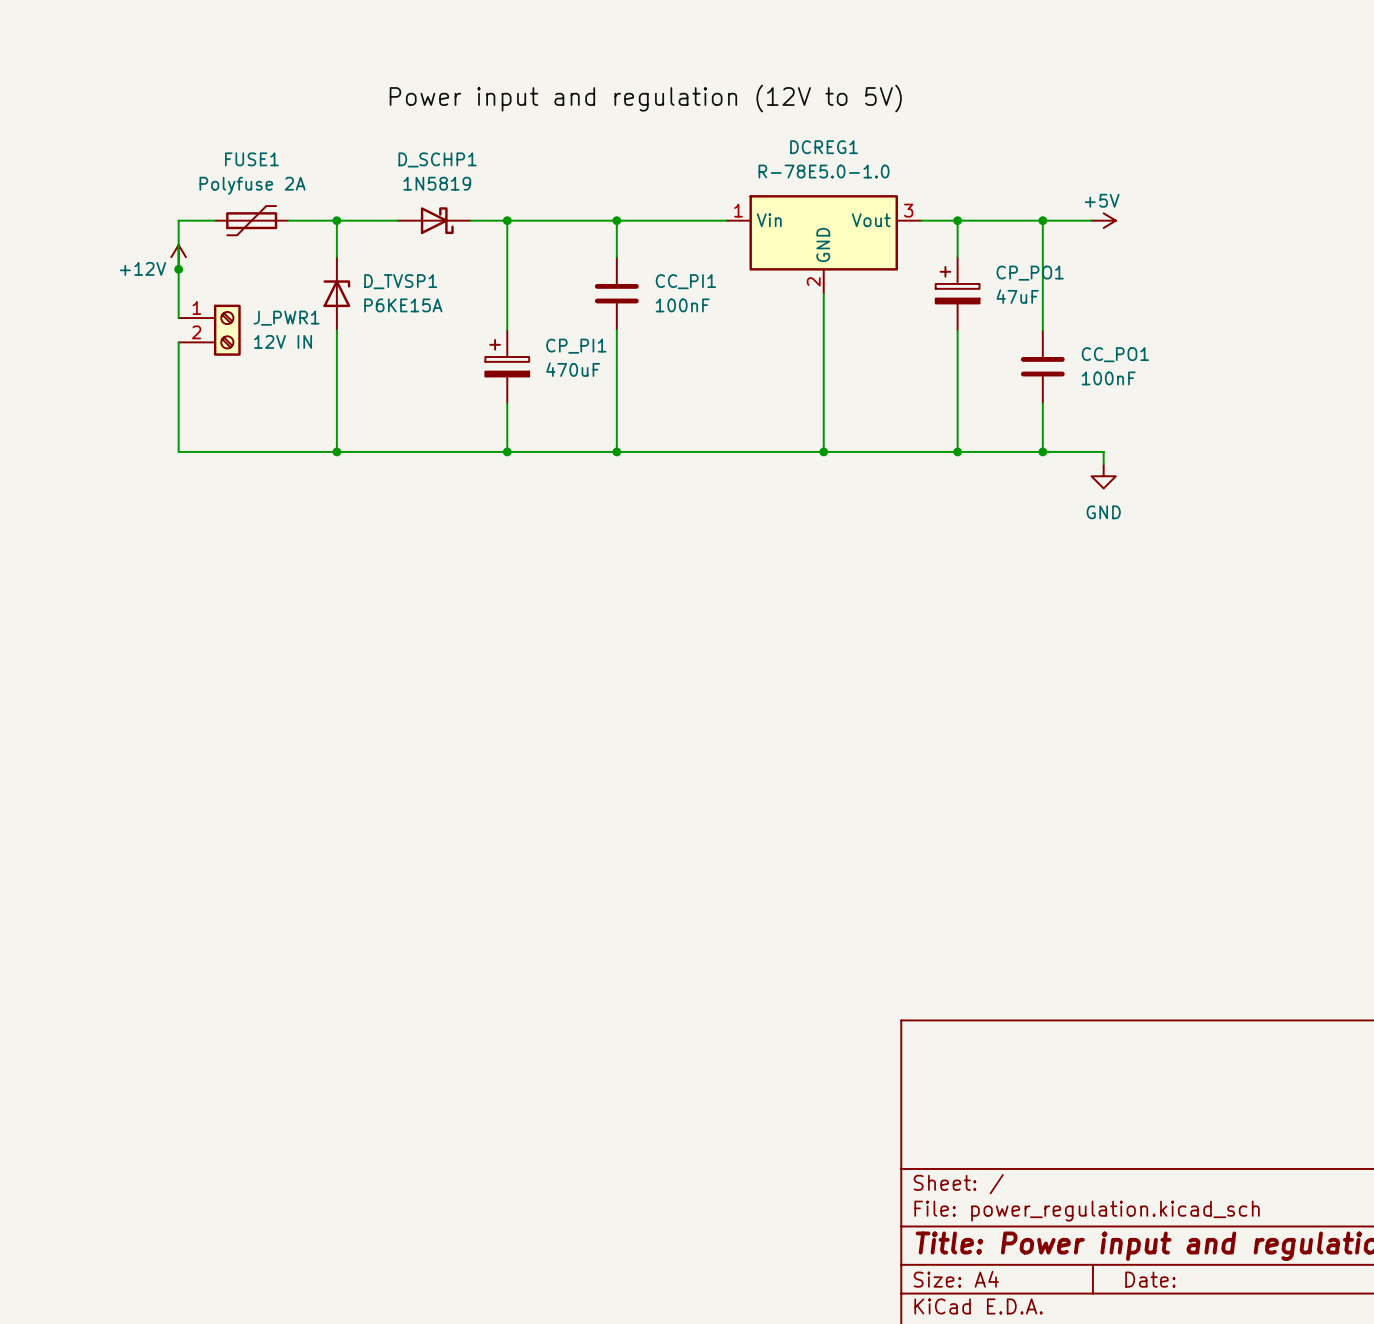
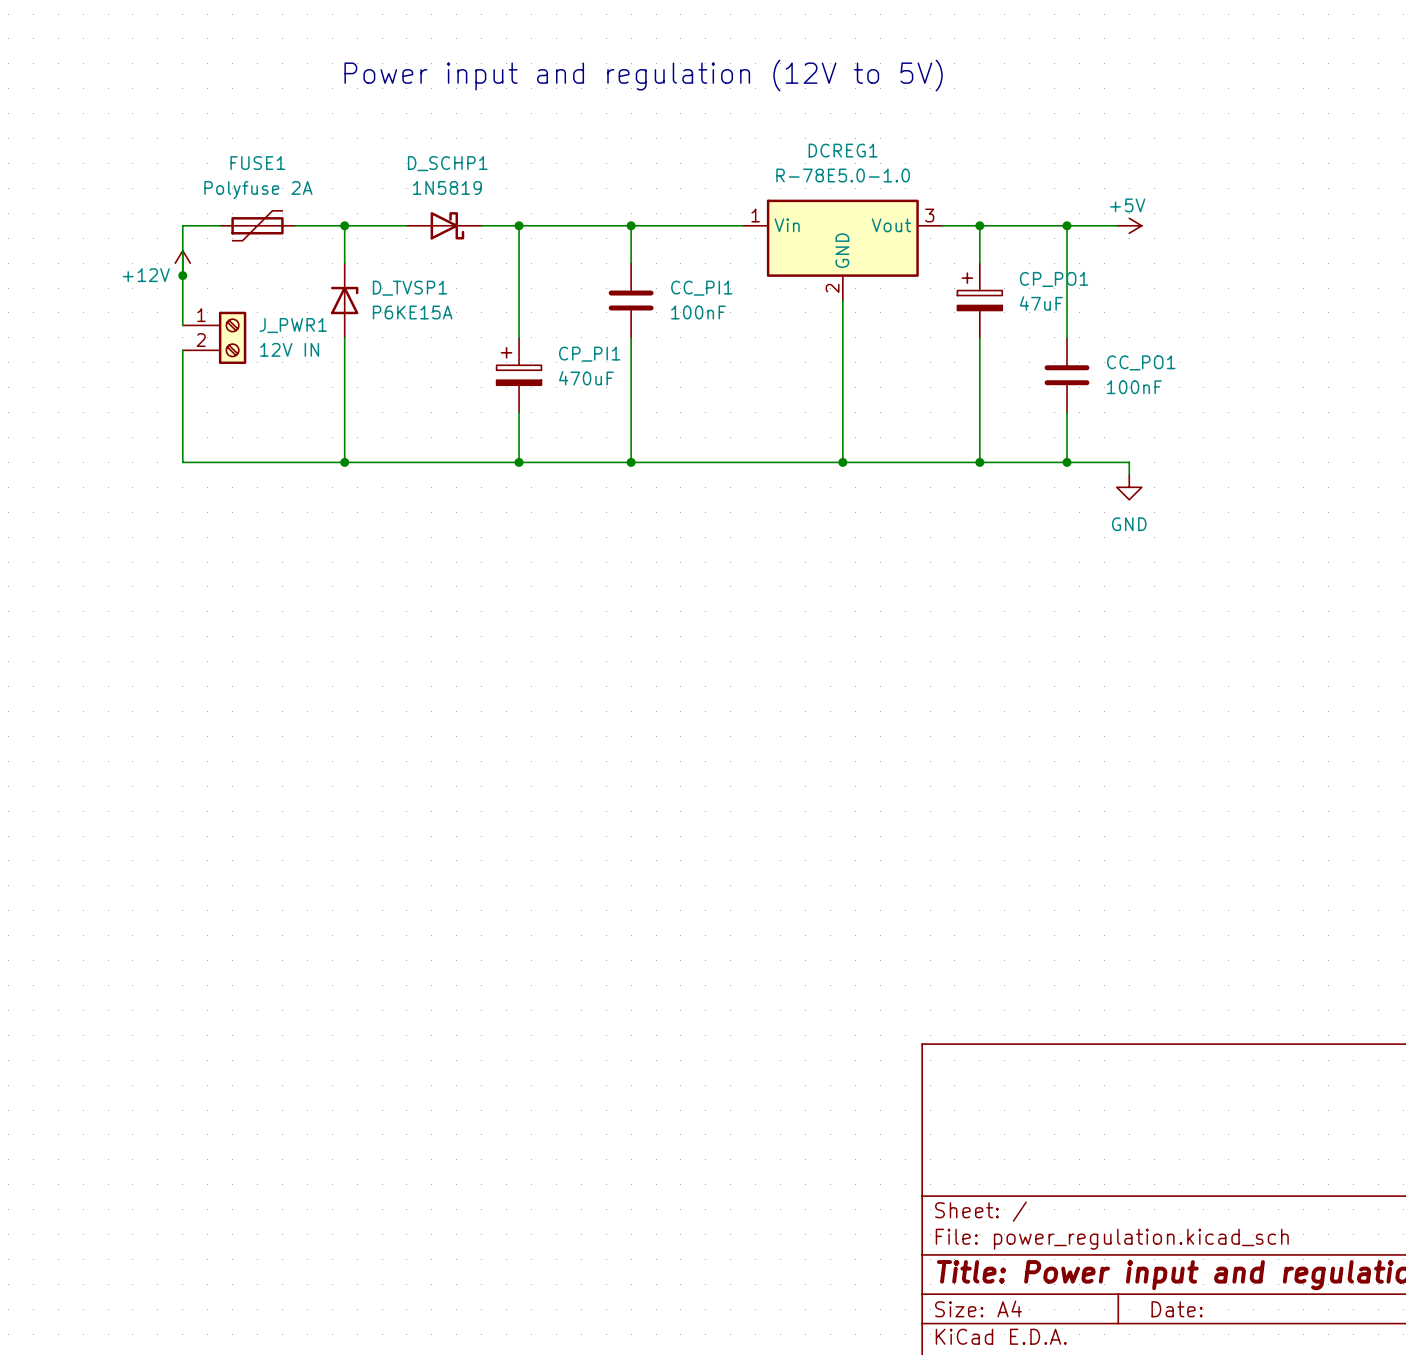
text: none -> Power input and regulation (12V to 5V) (643, 75)
label: Power input and regulation (12V to 5V) (645, 98) -> none

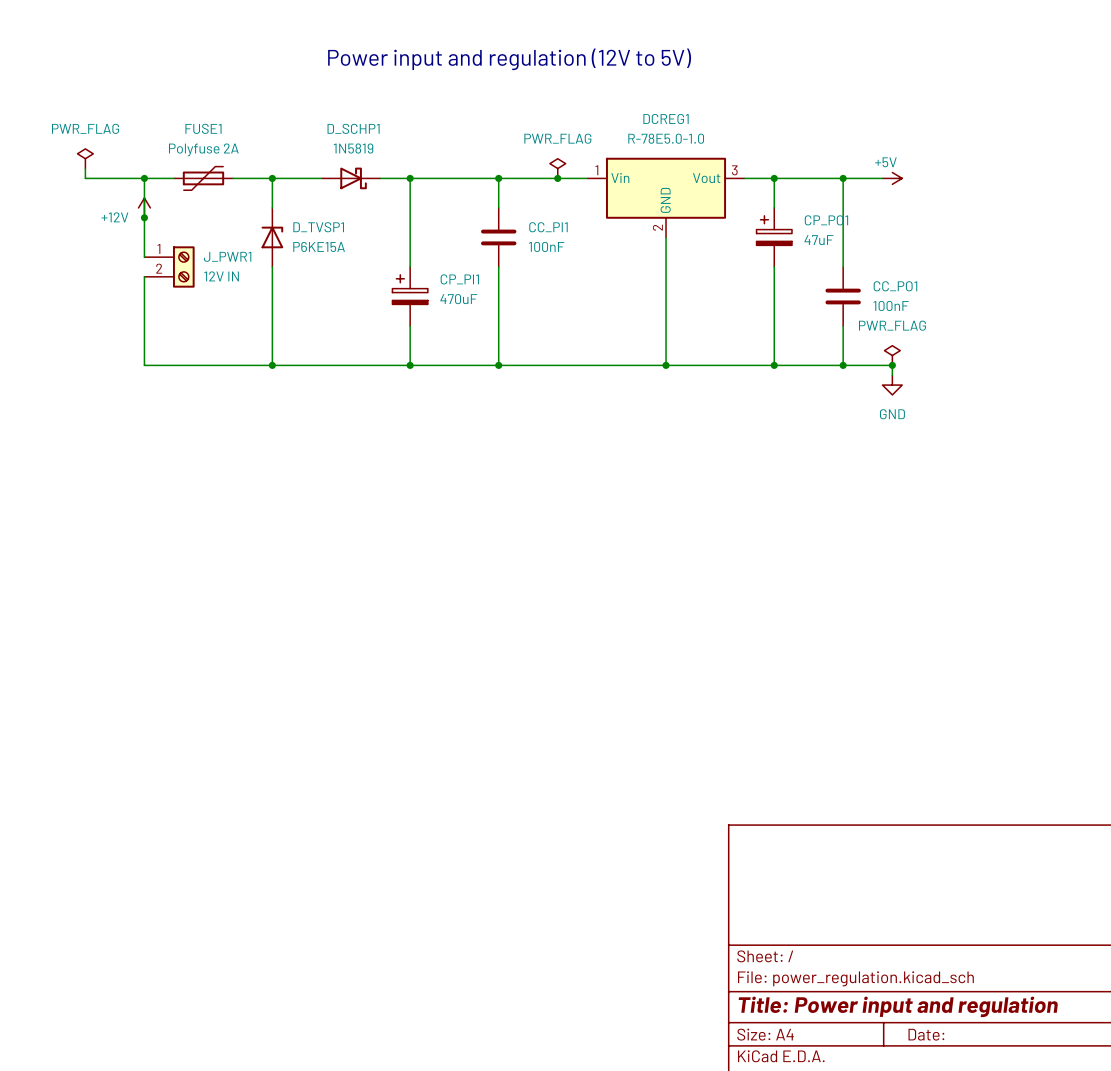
power symbol: none -> PWR_FLAG (85, 158)
wire: none -> (85, 168) (85, 178) (144, 178)
power symbol: none -> PWR_FLAG (557, 168)
junction: none -> (144, 178)
junction: none -> (557, 178)
power symbol: none -> PWR_FLAG (892, 355)
junction: none -> (892, 365)

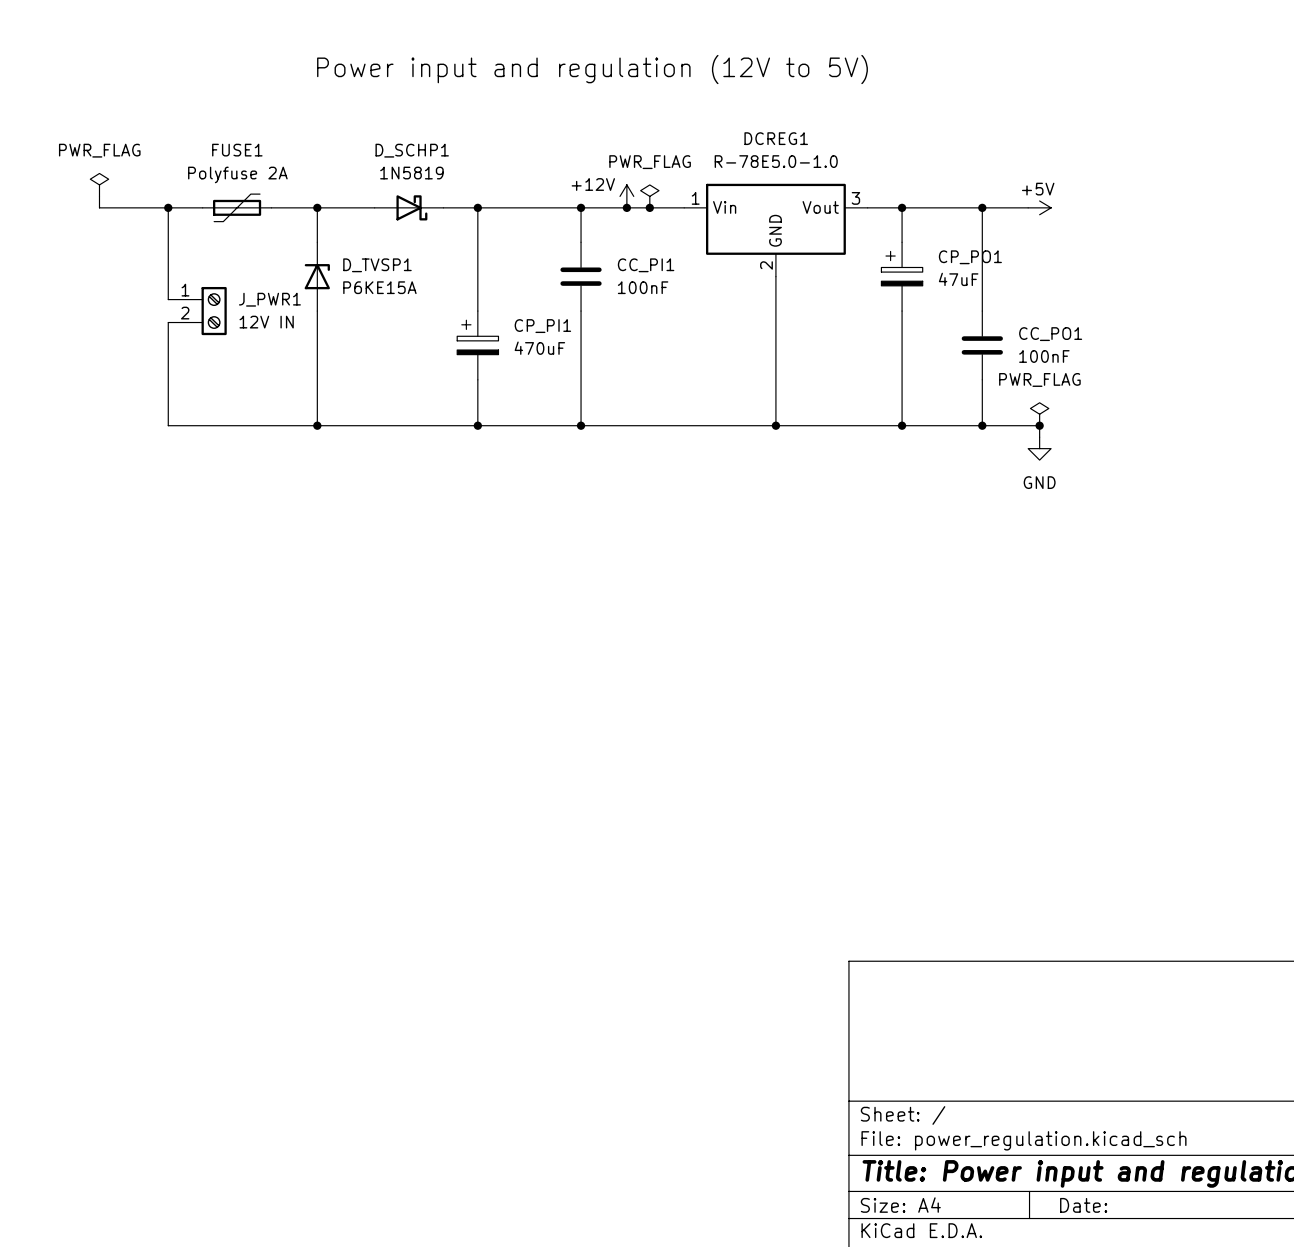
power symbol: none -> +12V (626, 196)
junction: none -> (626, 207)
power symbol: +12V (144, 207) -> none
junction: (144, 217) -> none

